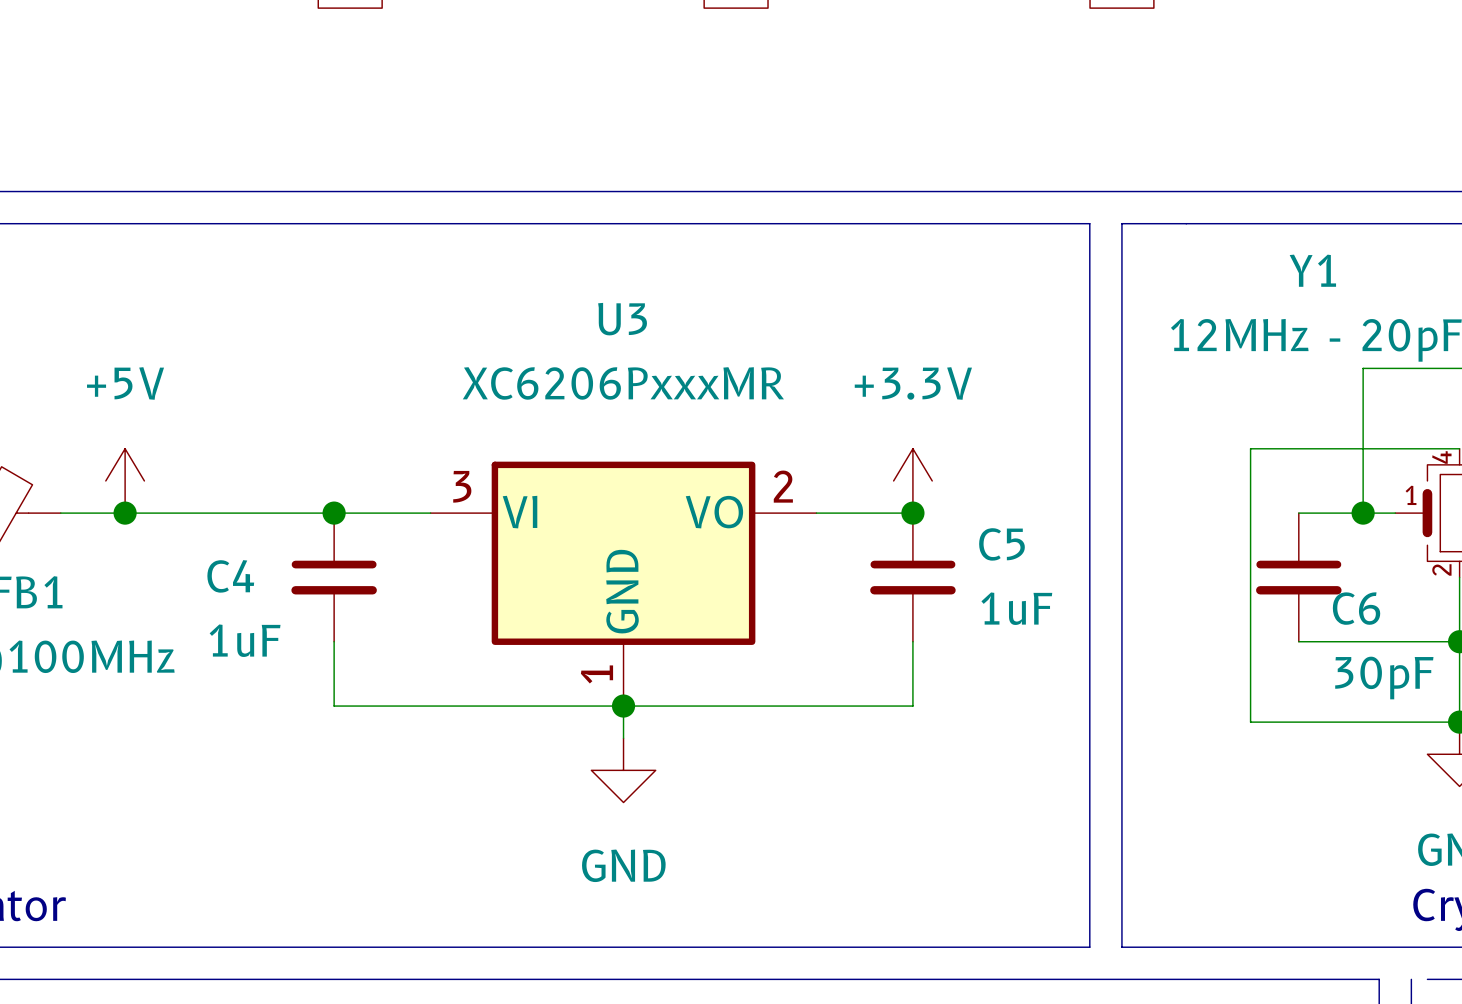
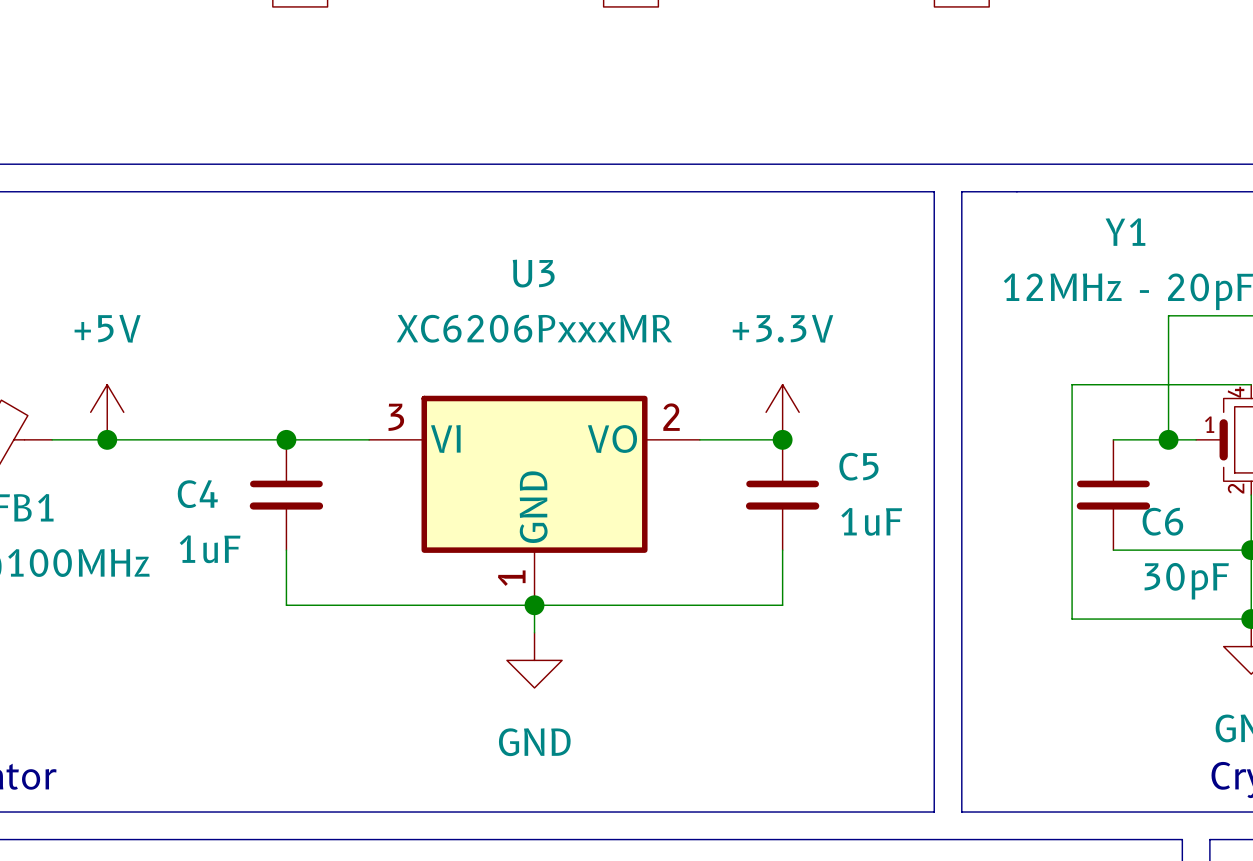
line: none -> (1209, 839) (1223, 839)

